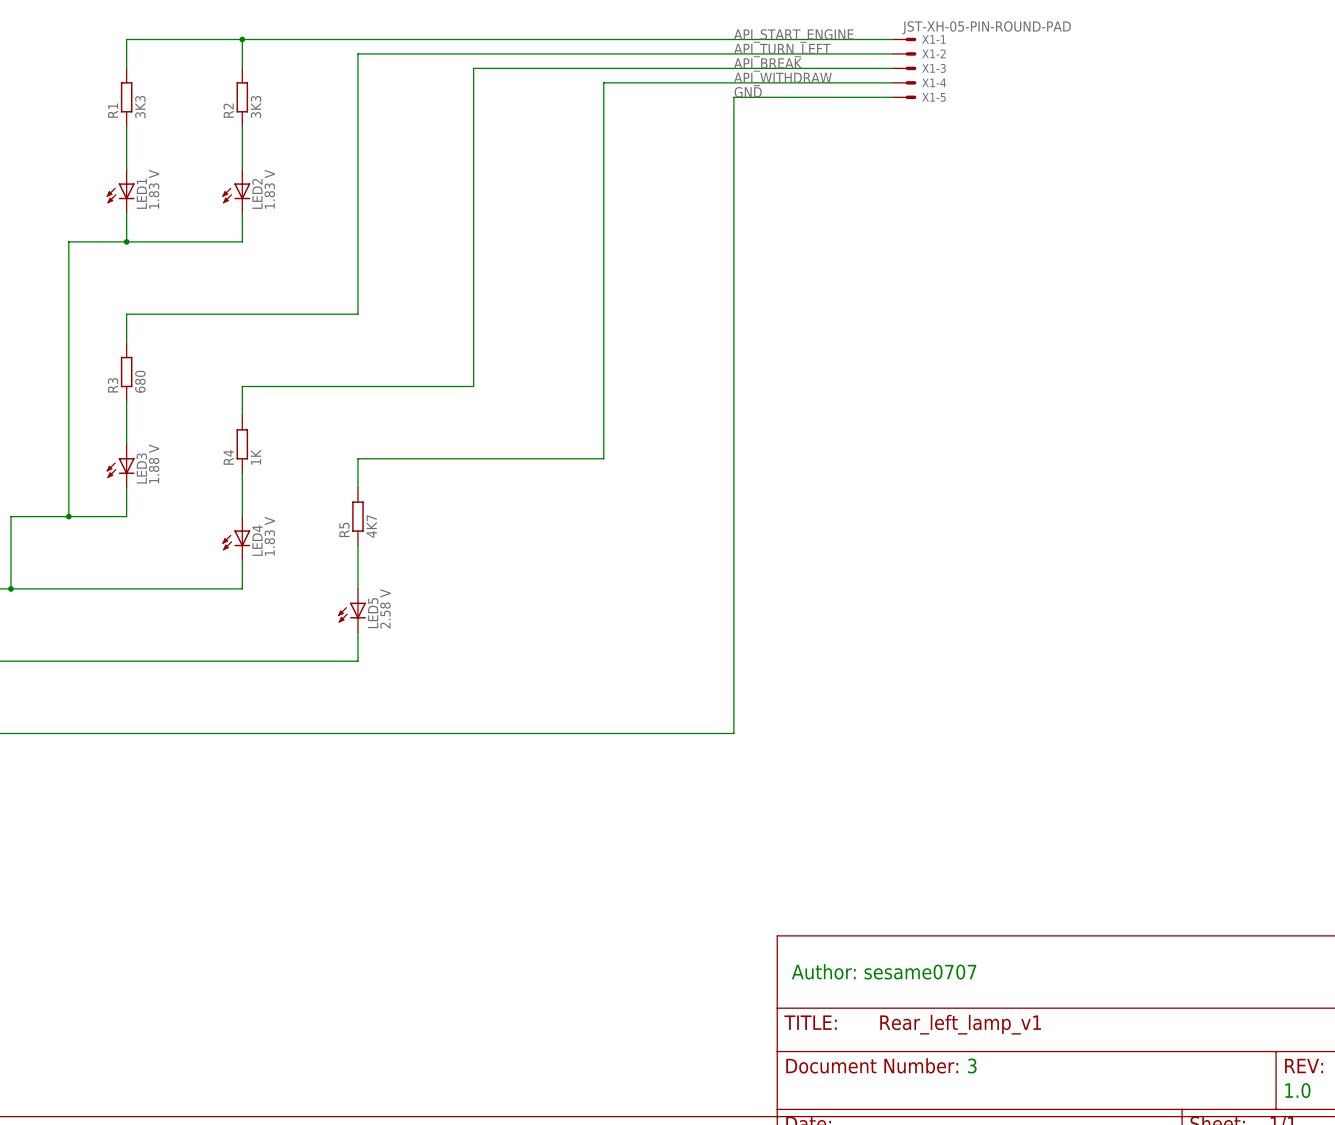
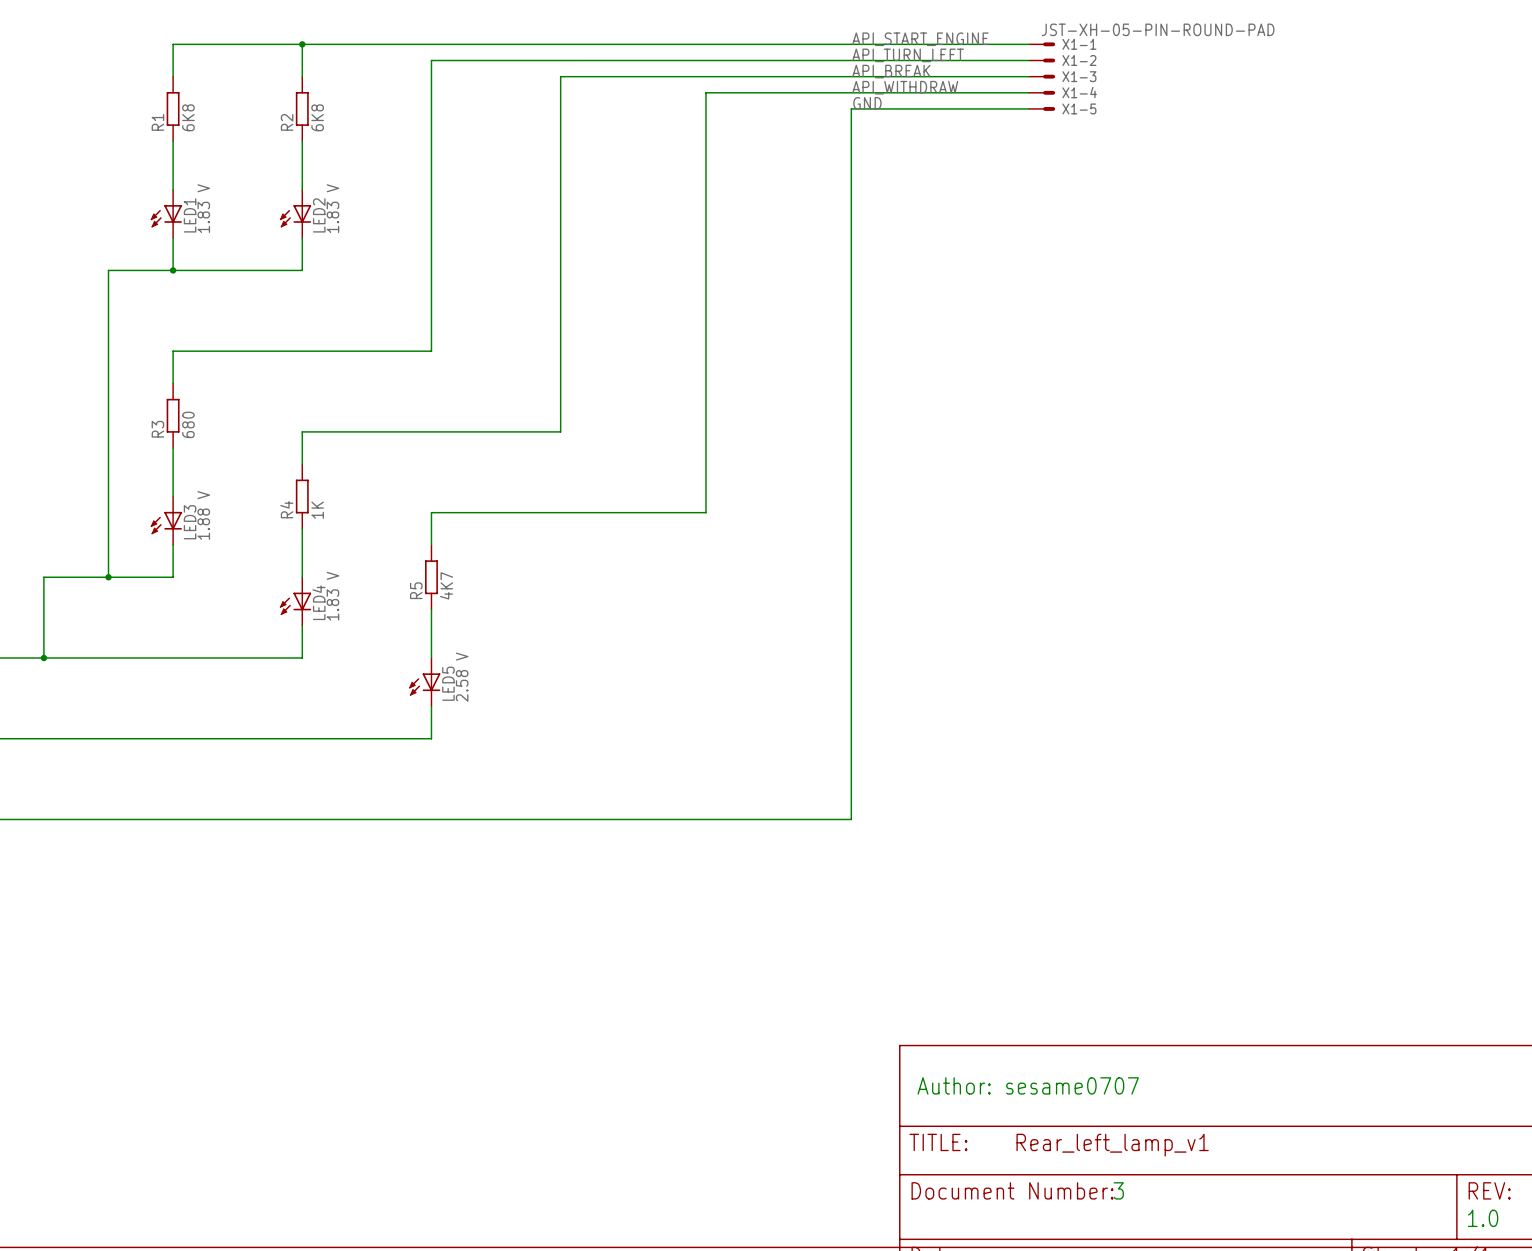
R1 value: 3K3 (140, 106) -> 6K8 (188, 117)
R2 value: 3K3 (256, 106) -> 6K8 (317, 117)

